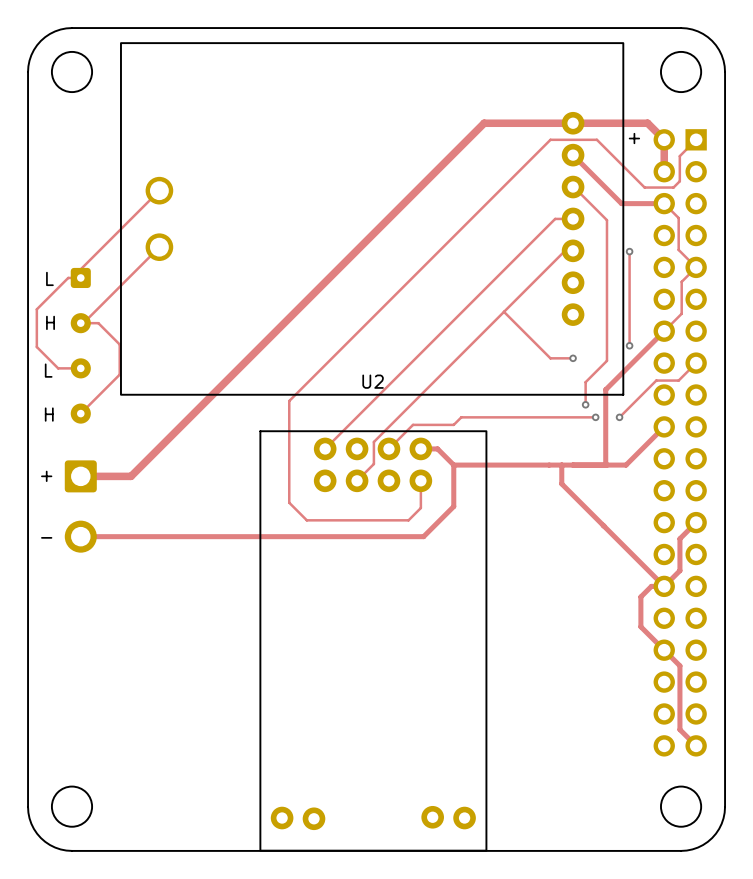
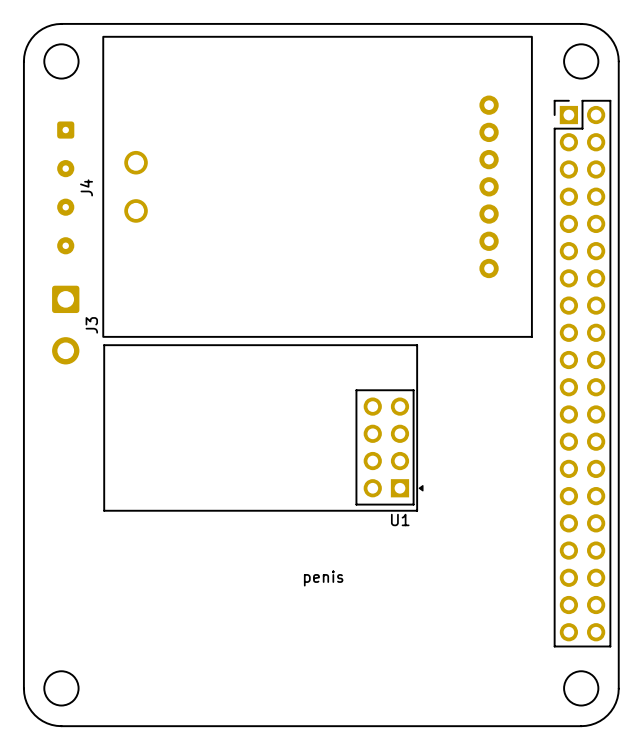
text: + (634, 138) -> none
track: (696, 139) (679, 156) (679, 181) (673, 187) (644, 187) (596, 139) (550, 139) (289, 401) (289, 502) (306, 520) (408, 520) (420, 508) (420, 480) -> none
track: (573, 155) (621, 203) (664, 203) (678, 218) (678, 249) (696, 267) (681, 281) (681, 313) (605, 389) (606, 465) -> none
track: (664, 171) (664, 139) (647, 123) (484, 123) (131, 476) (80, 476) -> none
track: (573, 187) (606, 220) (606, 360) (585, 382) (585, 404) -> none
track: (159, 190) (80, 269) (80, 277) (68, 277) (36, 309) (36, 347) (58, 368) (80, 368) -> none
track: (573, 218) (555, 218) (325, 448) -> none
J4: none -> (65, 187)
track: (159, 247) (83, 323) -> none
track: (573, 250) (565, 250) (373, 441) (373, 464) (357, 480) -> none
track: (629, 251) (629, 345) -> none
via: (629, 251) -> none
text: L (49, 278) -> none
track: (504, 311) (550, 358) (573, 358) -> none
text: H (50, 322) -> none
track: (80, 323) (98, 323) (119, 344) (119, 374) (80, 413) -> none
part: (80, 345) -> none
via: (629, 345) -> none
via: (573, 358) -> none
track: (696, 363) (678, 380) (656, 380) (619, 417) -> none
text: L (48, 370) -> none
J3: none -> (65, 325)
via: (585, 404) -> none
text: H (49, 414) -> none
track: (595, 417) (461, 417) (453, 424) (413, 424) (388, 448) -> none
via: (595, 417) -> none
via: (619, 417) -> none
track: (664, 426) (626, 465) (453, 465) -> none
part side: bottom (680, 442) -> top (582, 373)
track: (420, 448) (437, 448) (453, 465) -> none
track: (453, 465) (453, 506) (423, 536) (80, 536) -> none
track: (561, 465) (561, 483) (664, 586) -> none
text: + (46, 476) -> none
U1: none -> (263, 427)
part: (80, 506) -> none
track: (696, 522) (679, 538) (679, 570) (664, 586) -> none
text: - (46, 537) -> none
track: (664, 586) (651, 586) (640, 596) (640, 626) (679, 665) (679, 729) (696, 745) -> none
U2: (373, 640) -> none
text: none -> penis (323, 578)

